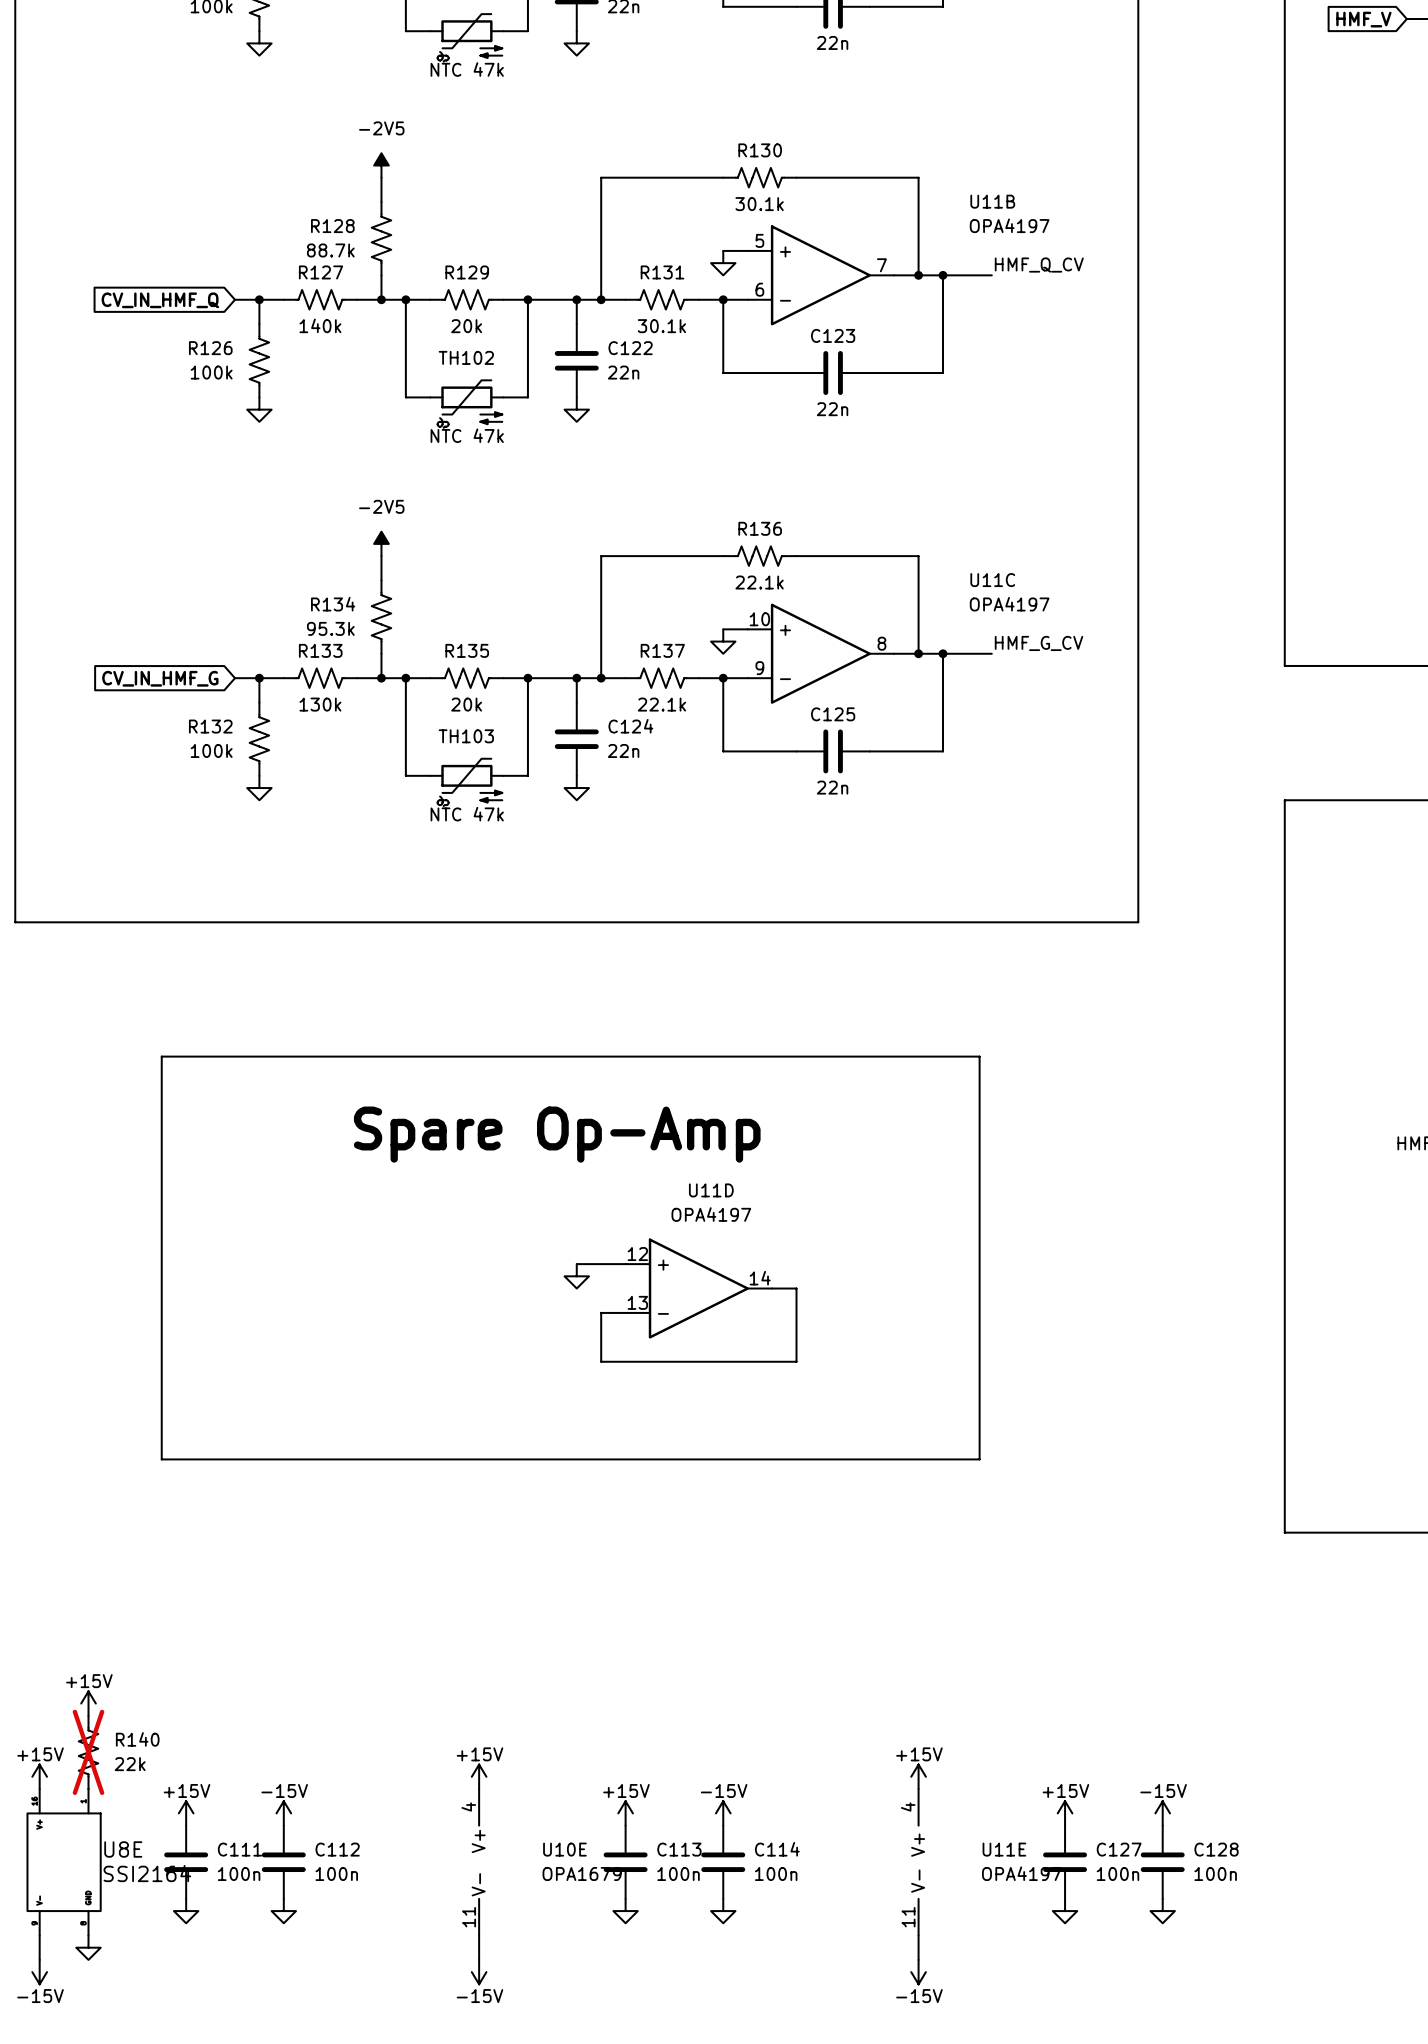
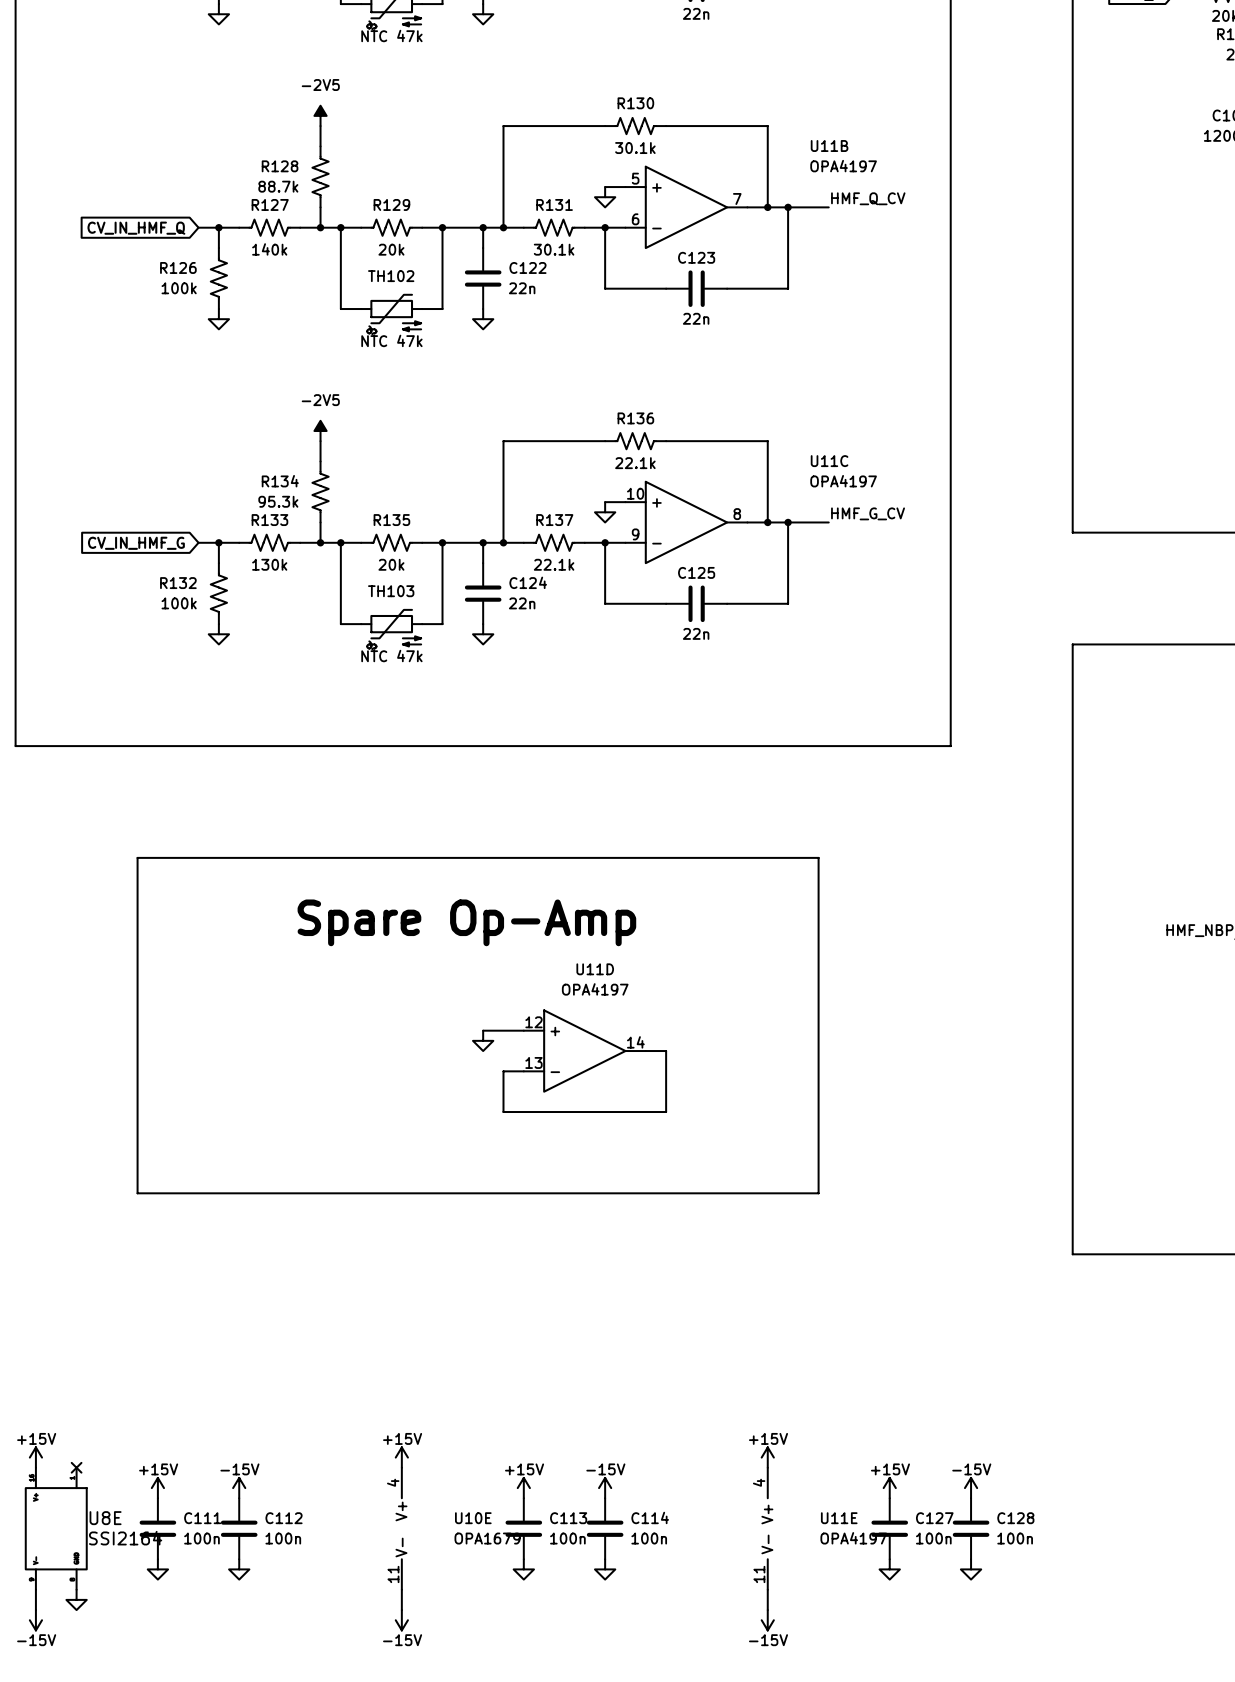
power symbol: +15V (88, 1703) -> none
R140: 22k (88, 1752) -> none
no-connect mark: none -> (76, 1467)

